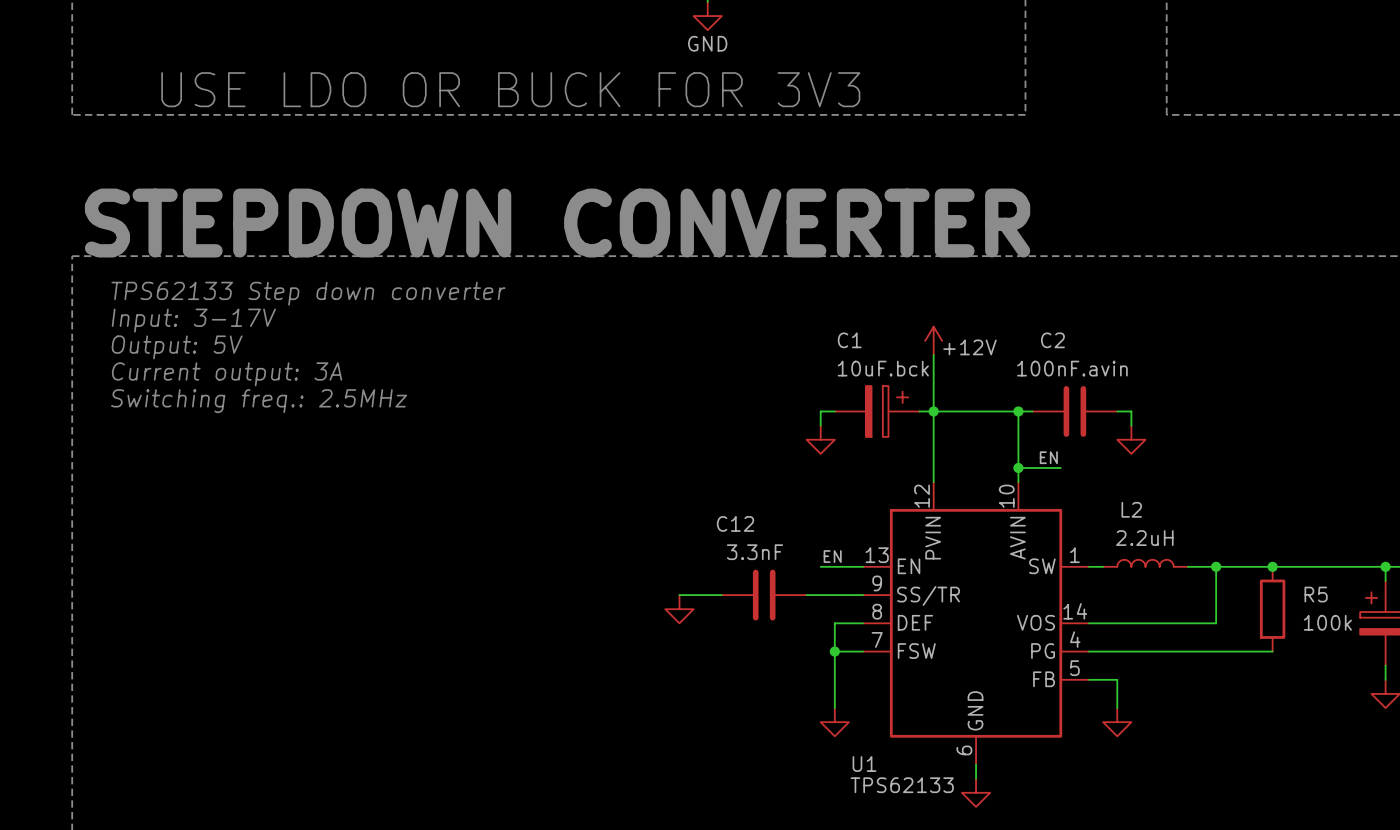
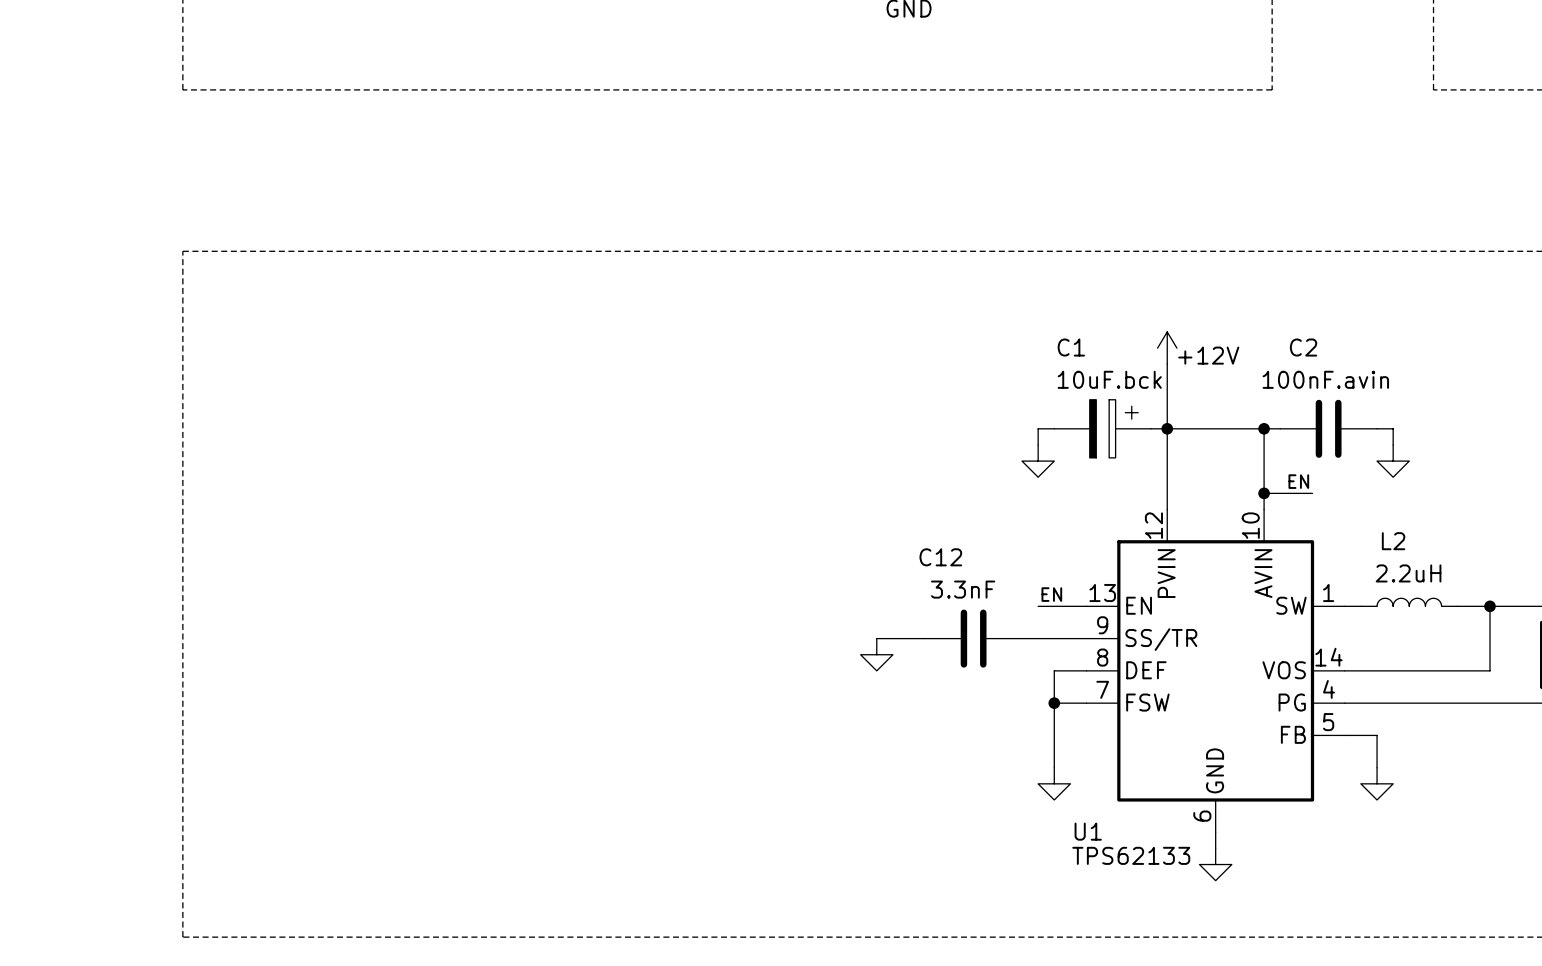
text: USE LDO OR BUCK FOR 3V3 (510, 89) -> none
text: STEPDOWN CONVERTER (557, 223) -> none
text: TPS62133 Step down converter (308, 293) -> none
text: Input: 3-17V (193, 320) -> none
text: Output: 5V (177, 347) -> none
text: Current output: 3A (227, 374) -> none
text: Switching freq.: 2.5MHz (259, 401) -> none

